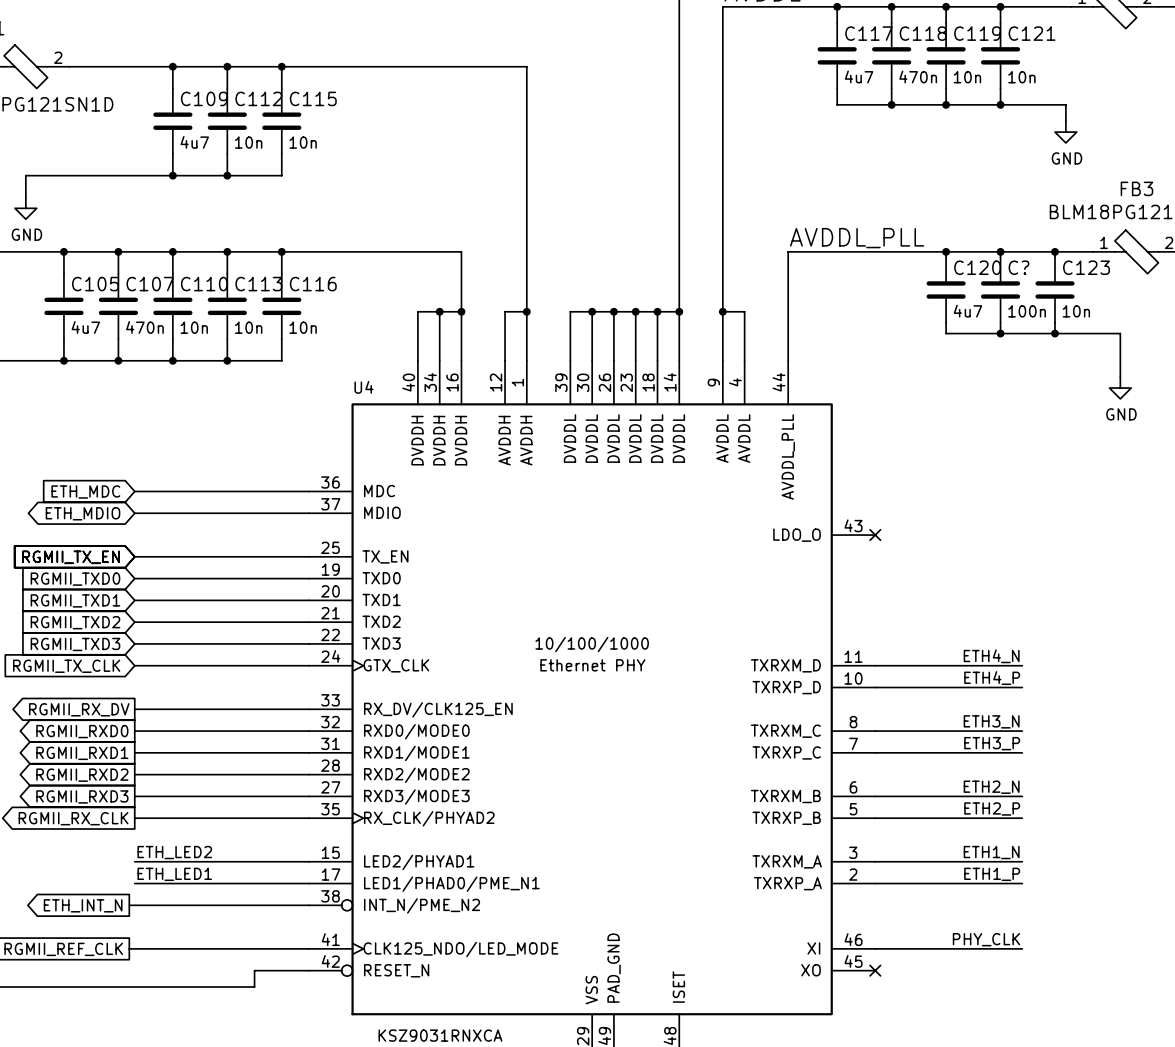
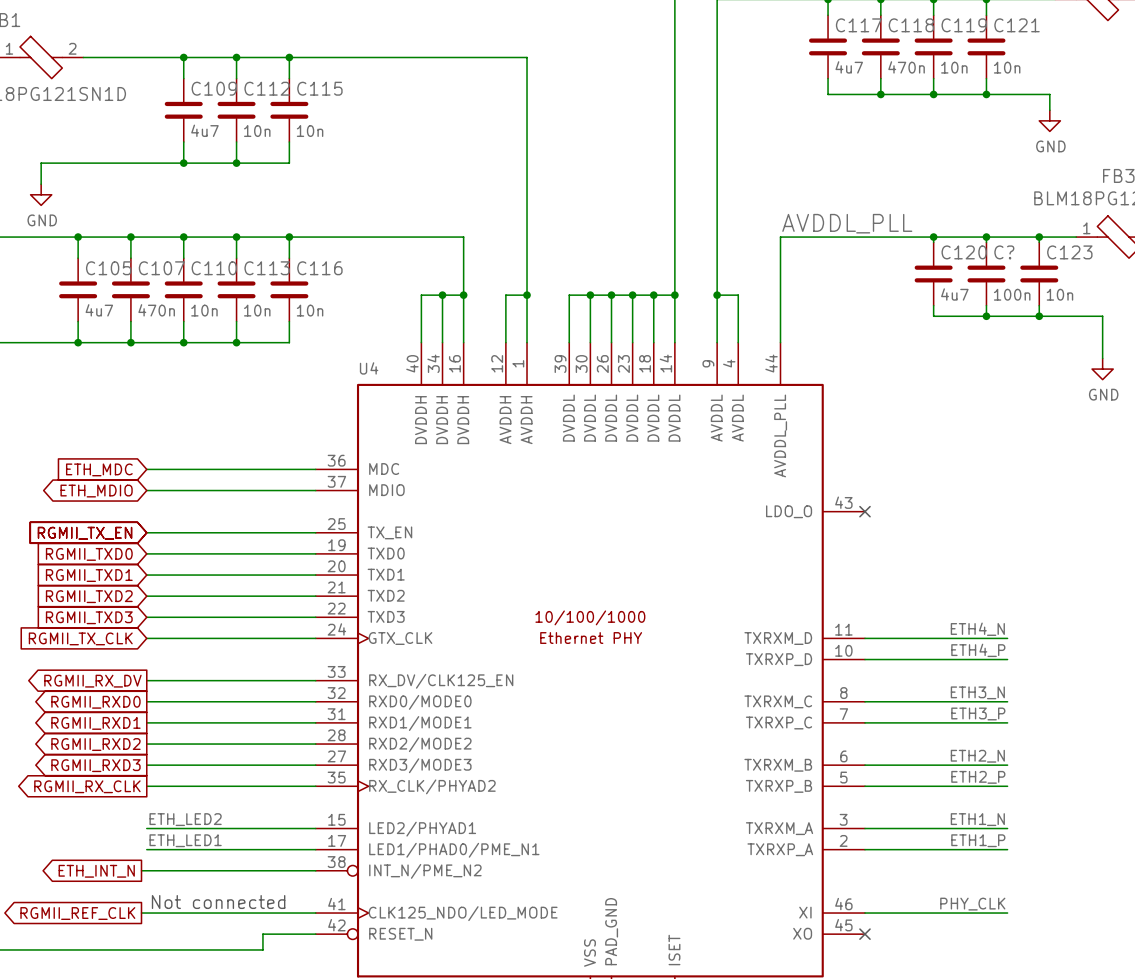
text: none -> Not connected (218, 902)

